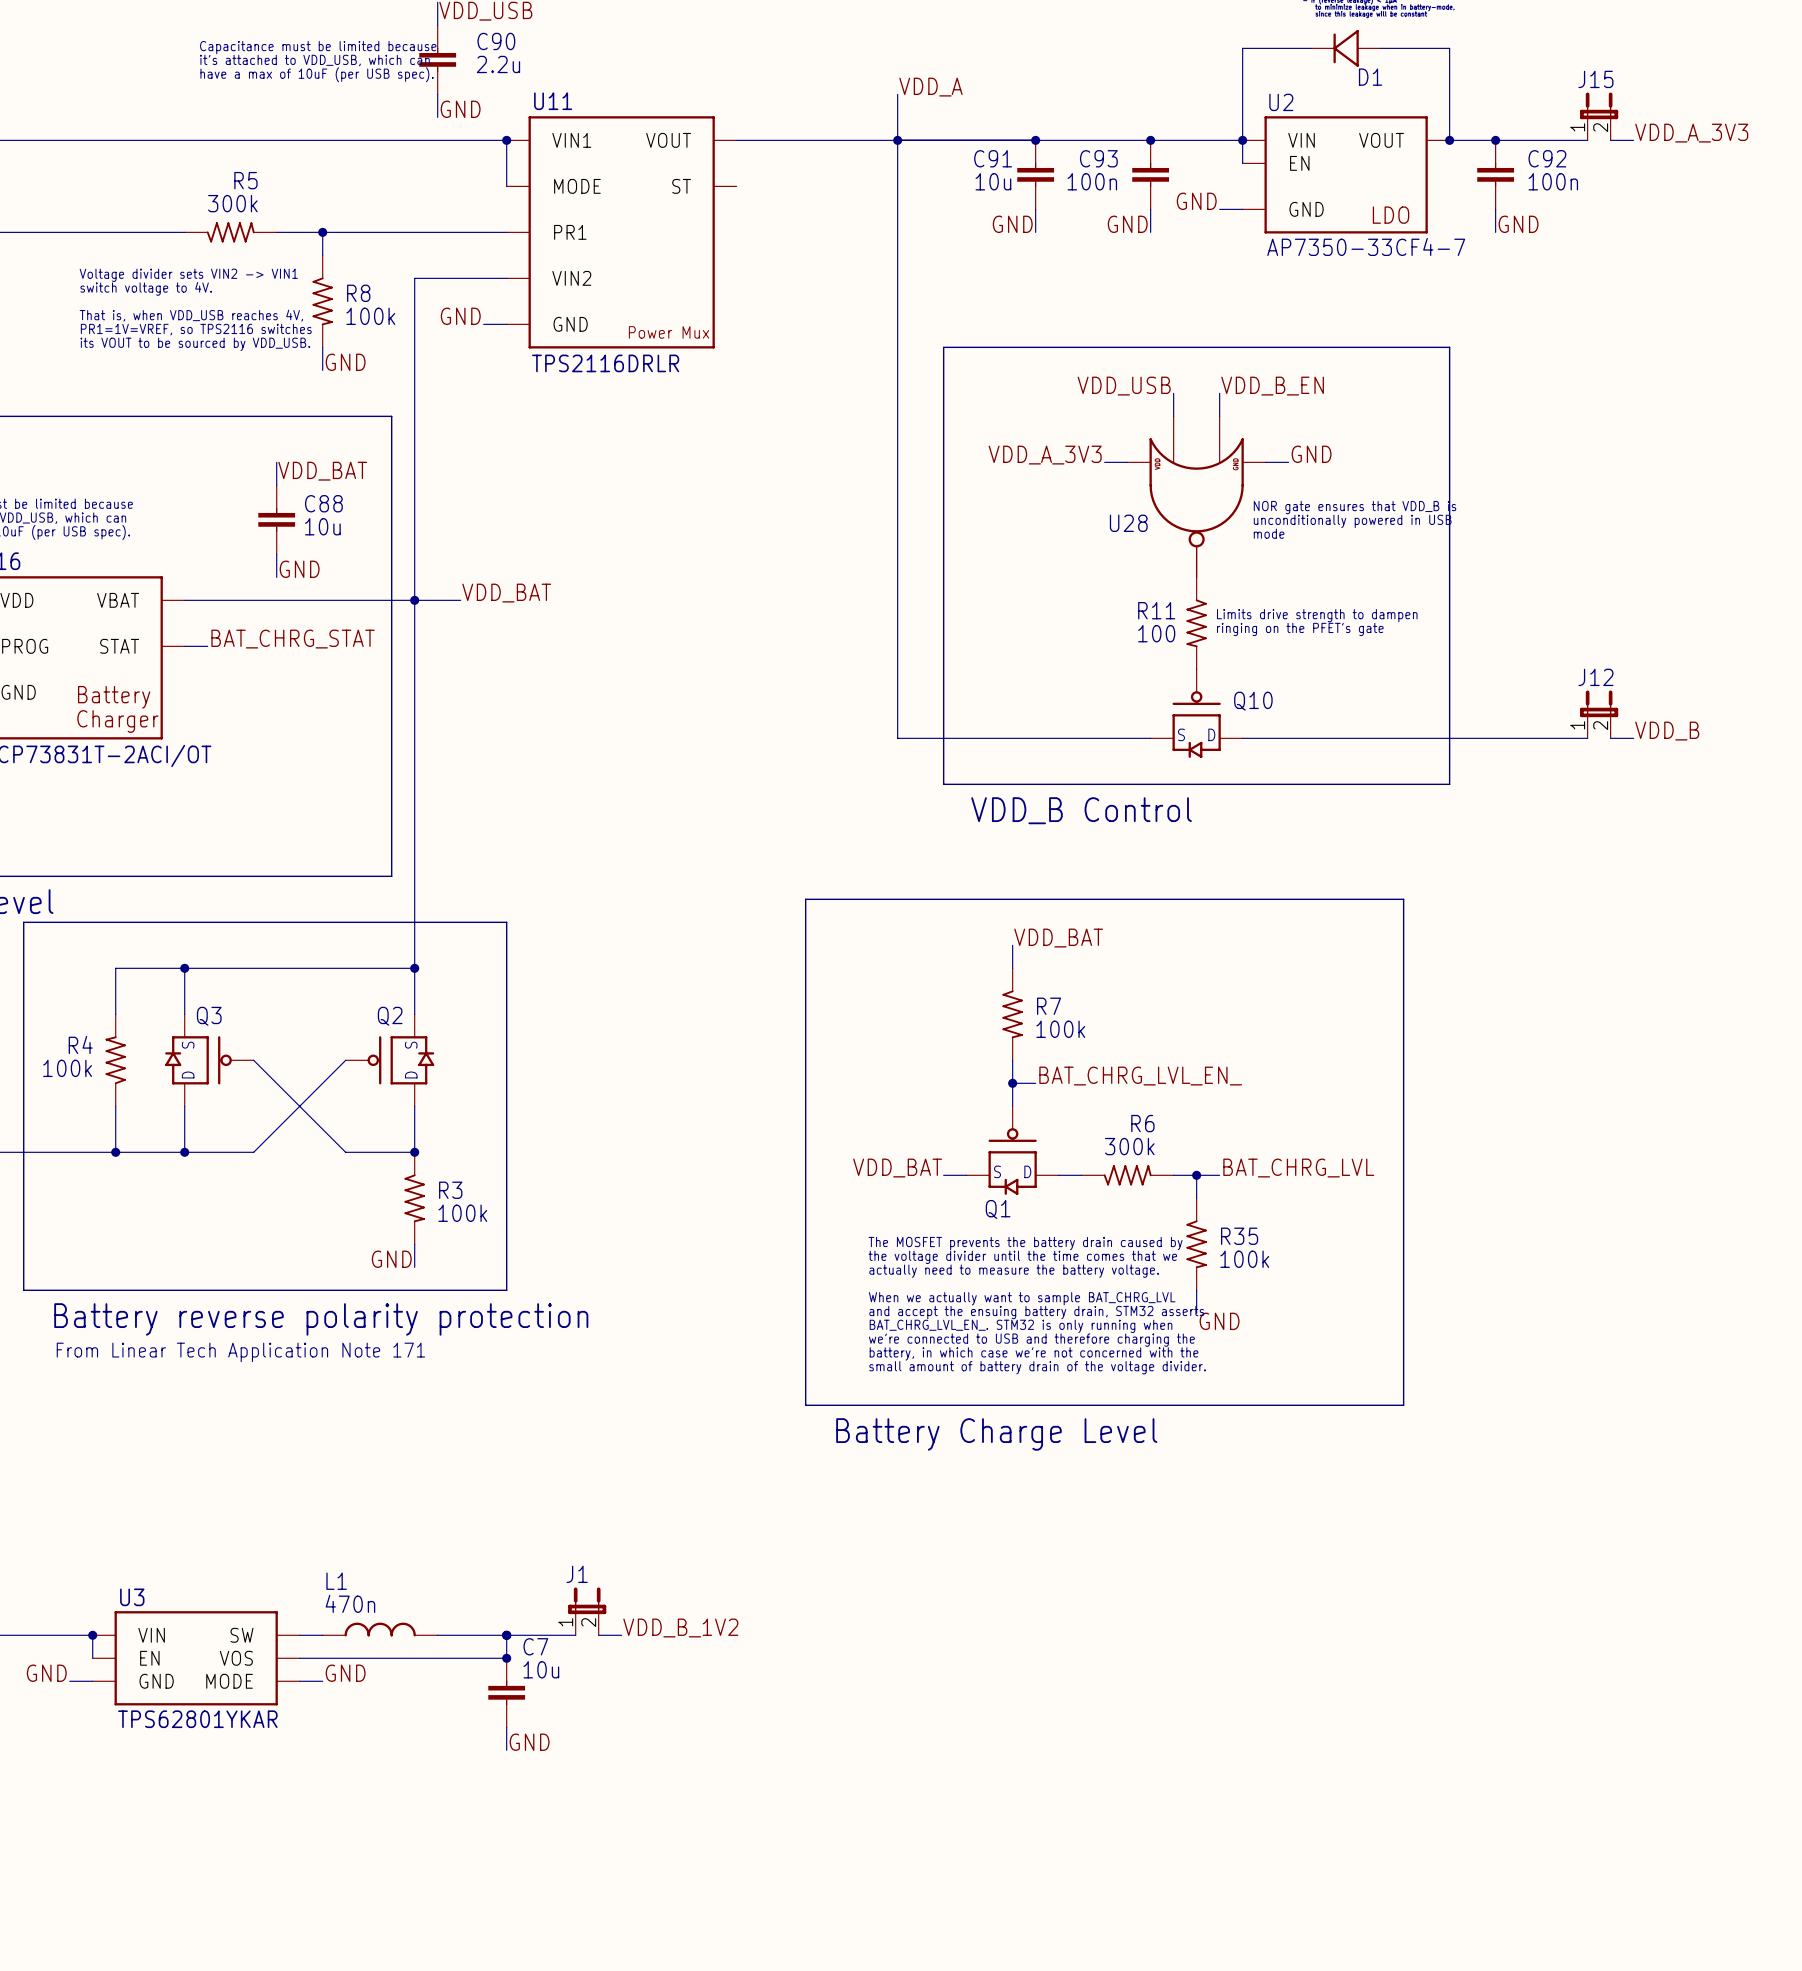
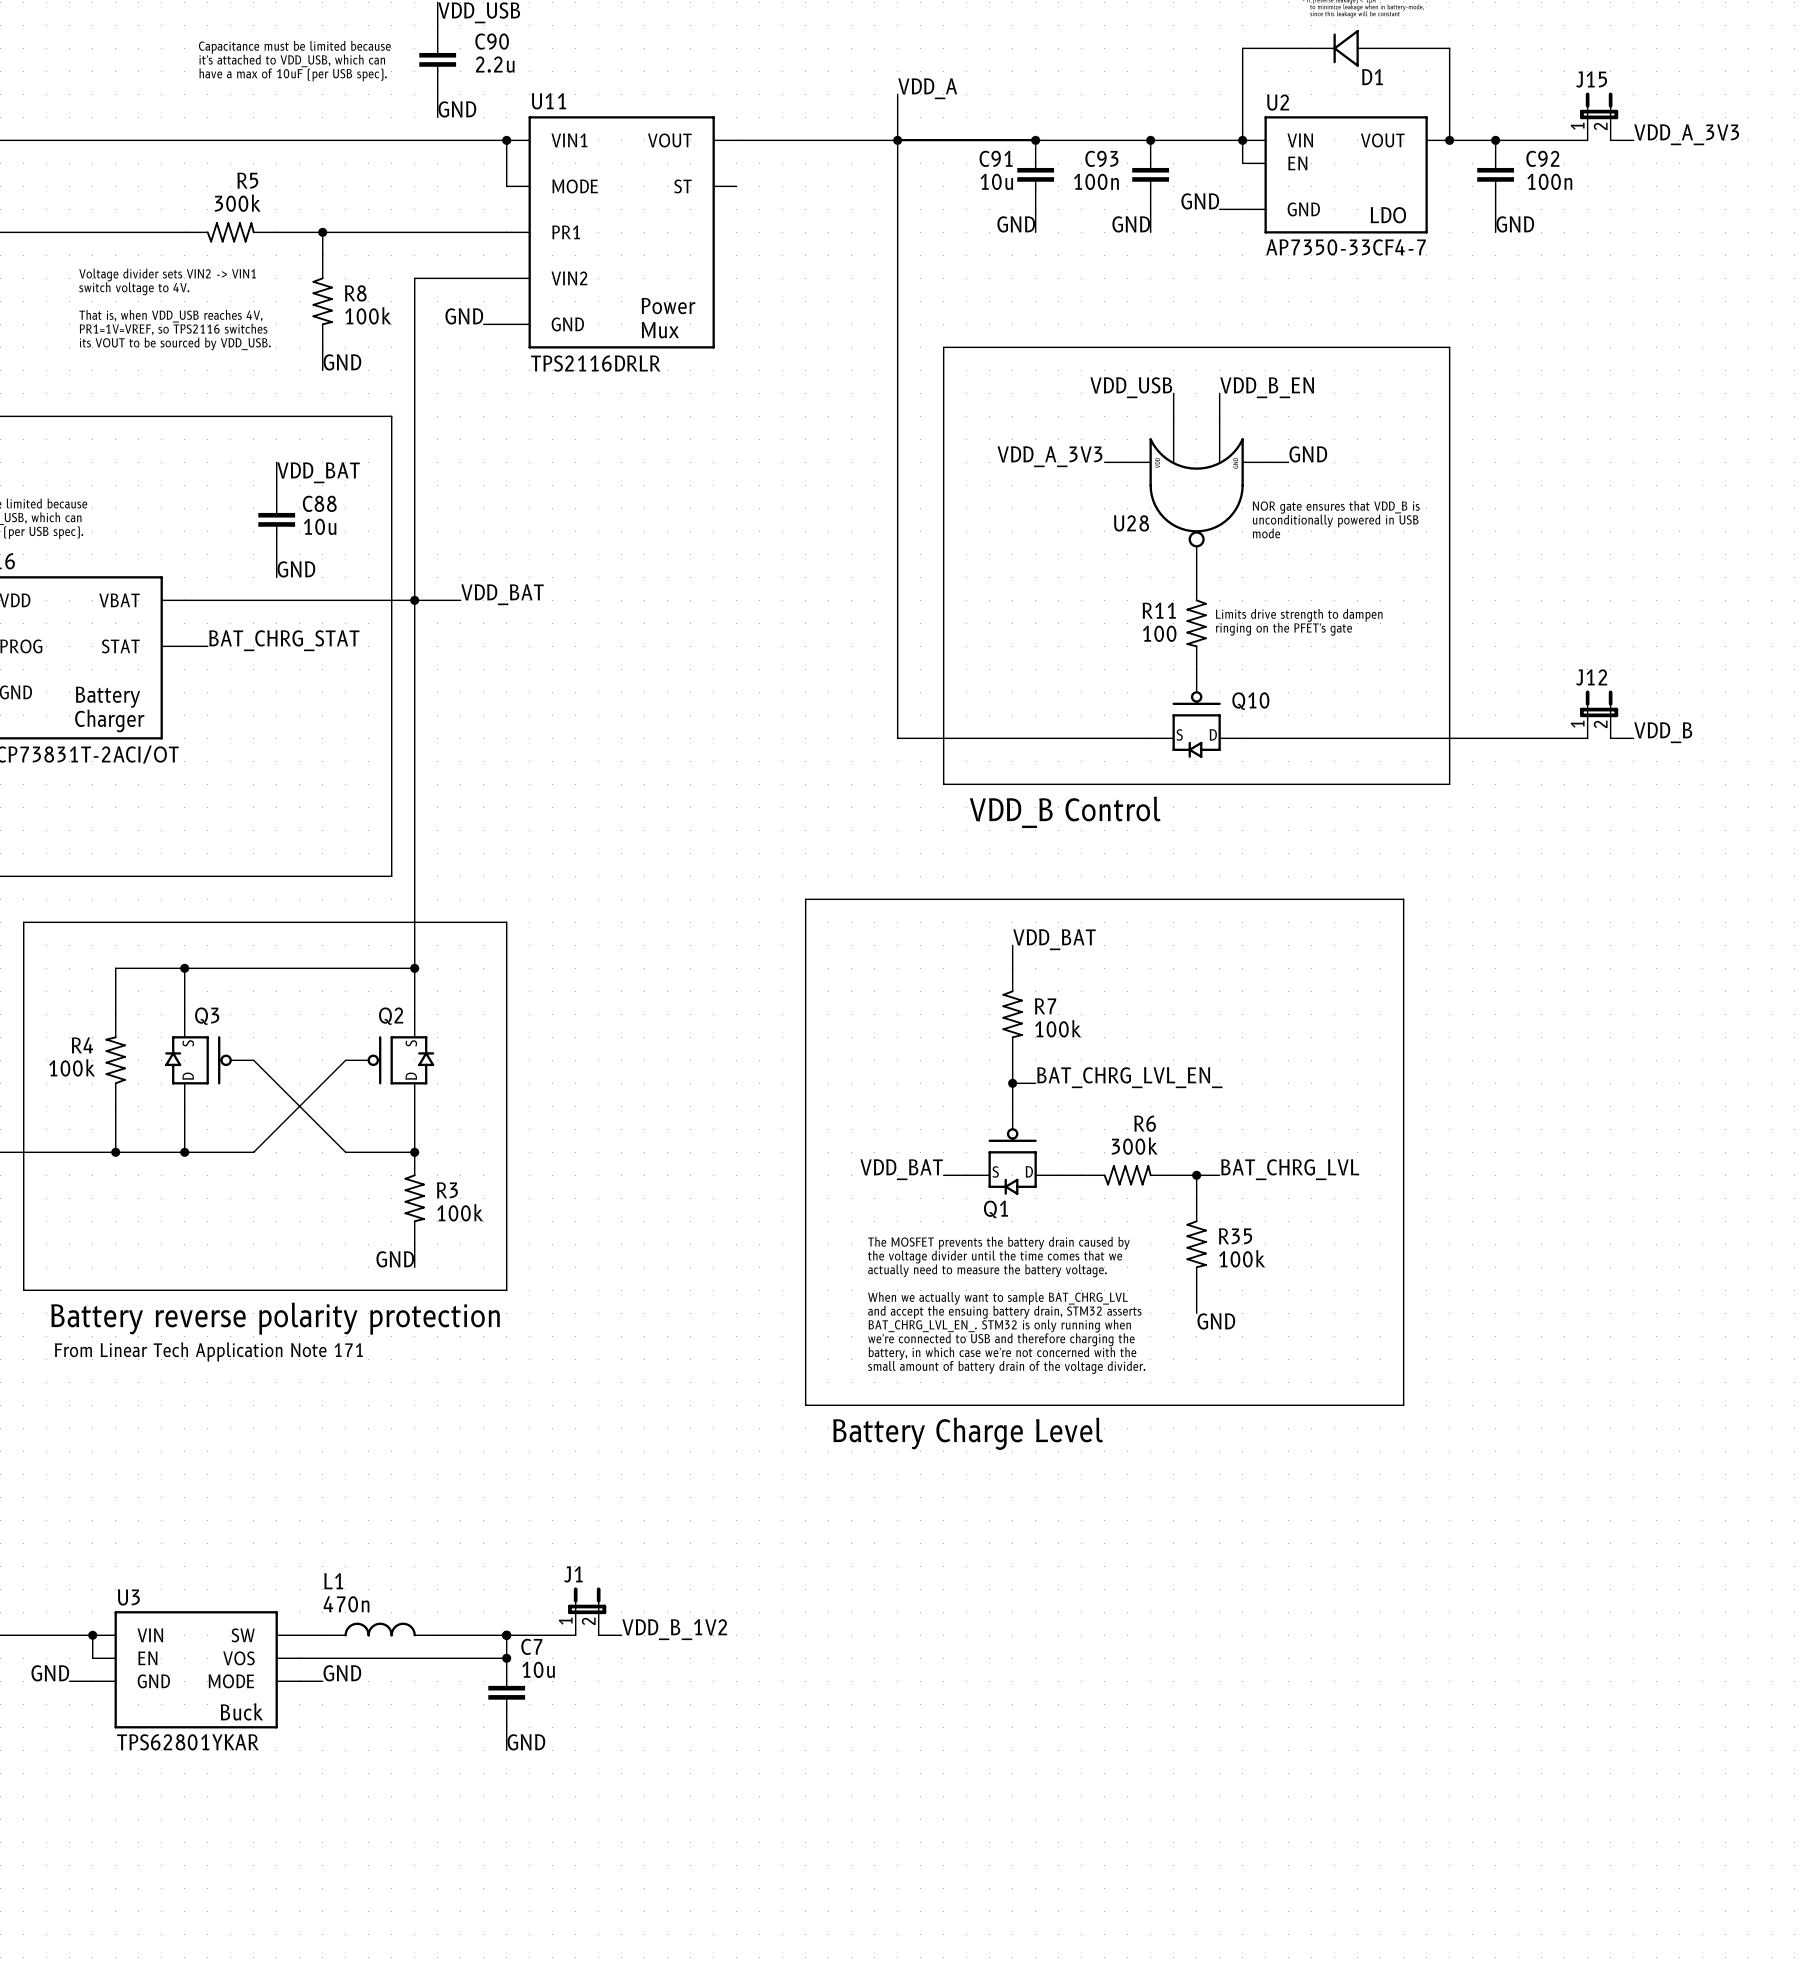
U11 text: none -> Power (668, 306)
U11 text: none -> Mux (660, 330)
U11 text: Power Mux (669, 332) -> none
U3 symbol: [92, 1611, 300, 1706] -> [92, 1611, 300, 1729]

